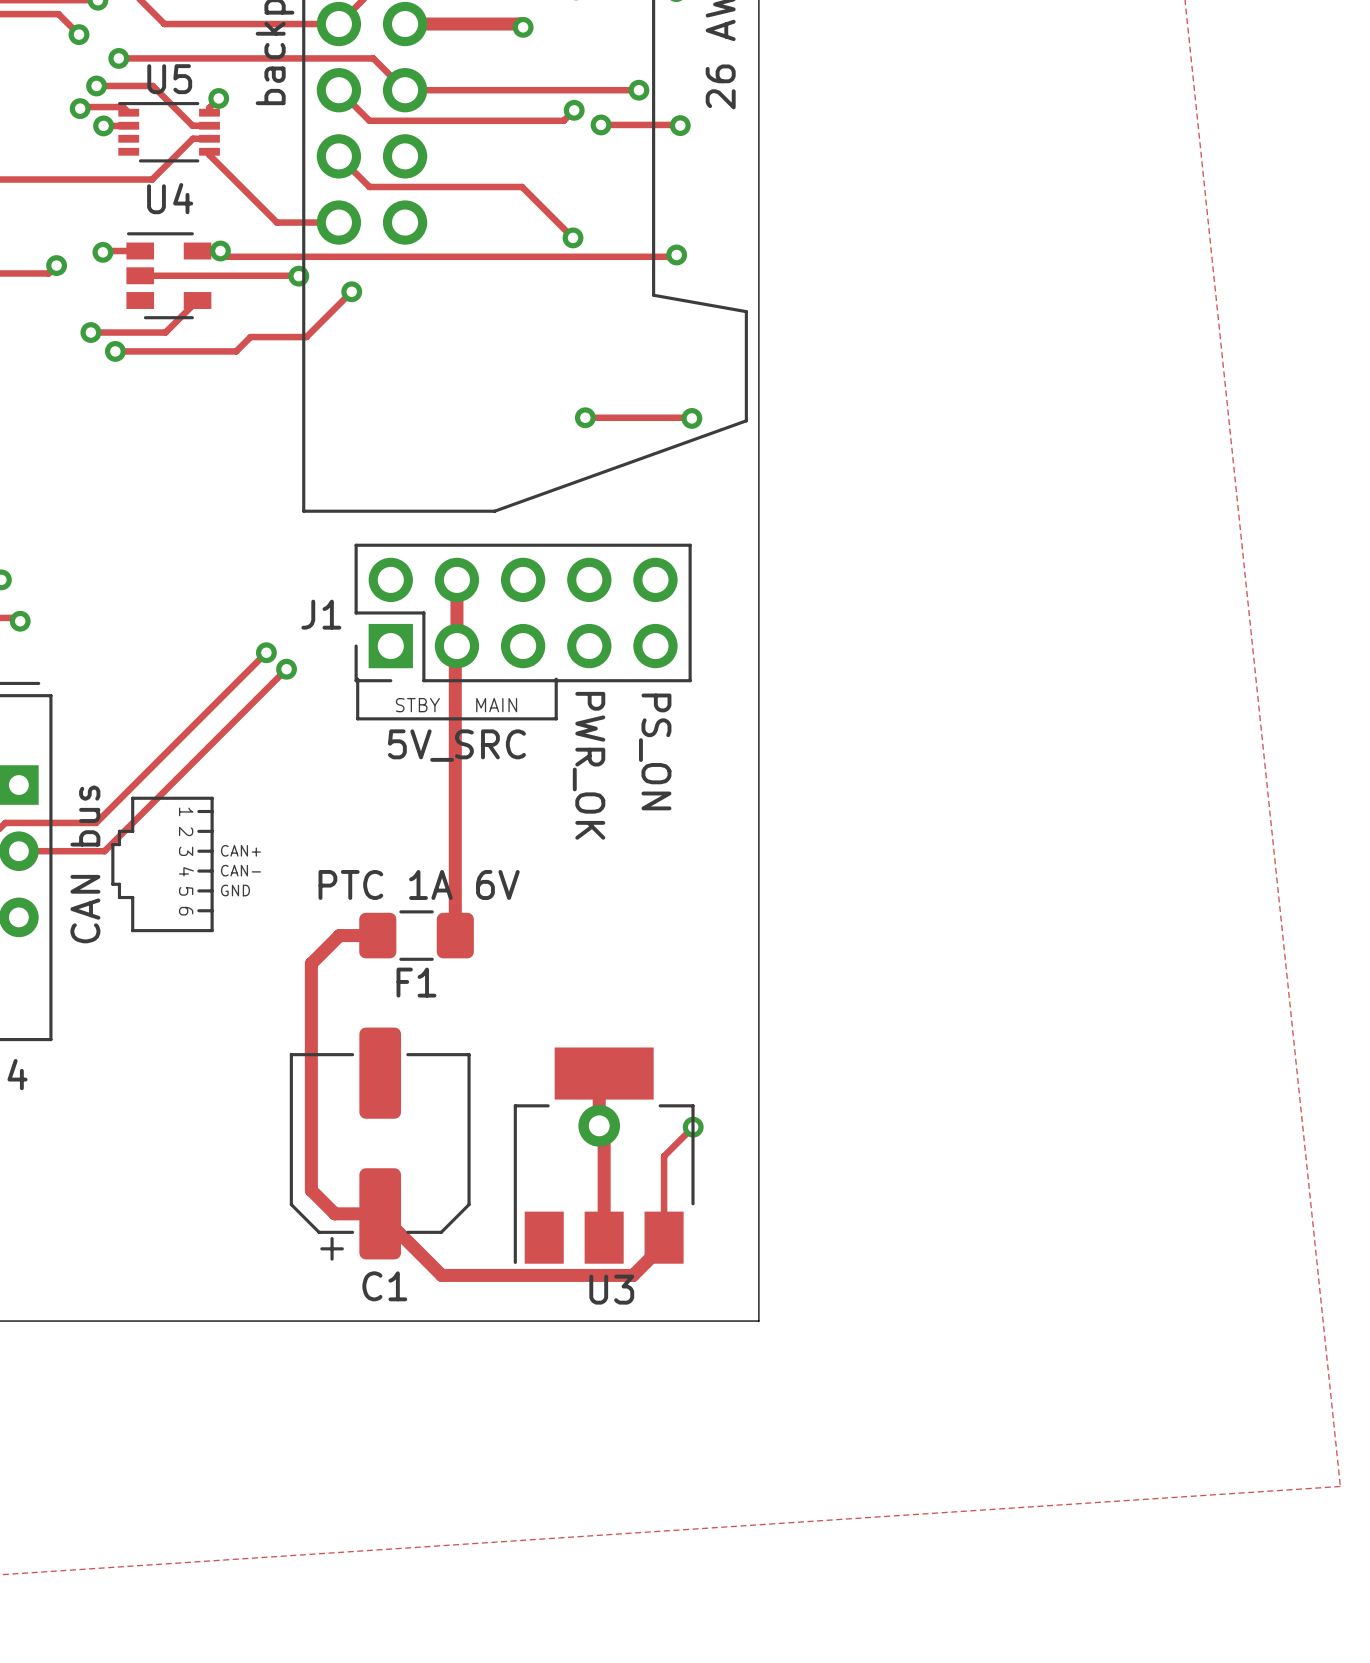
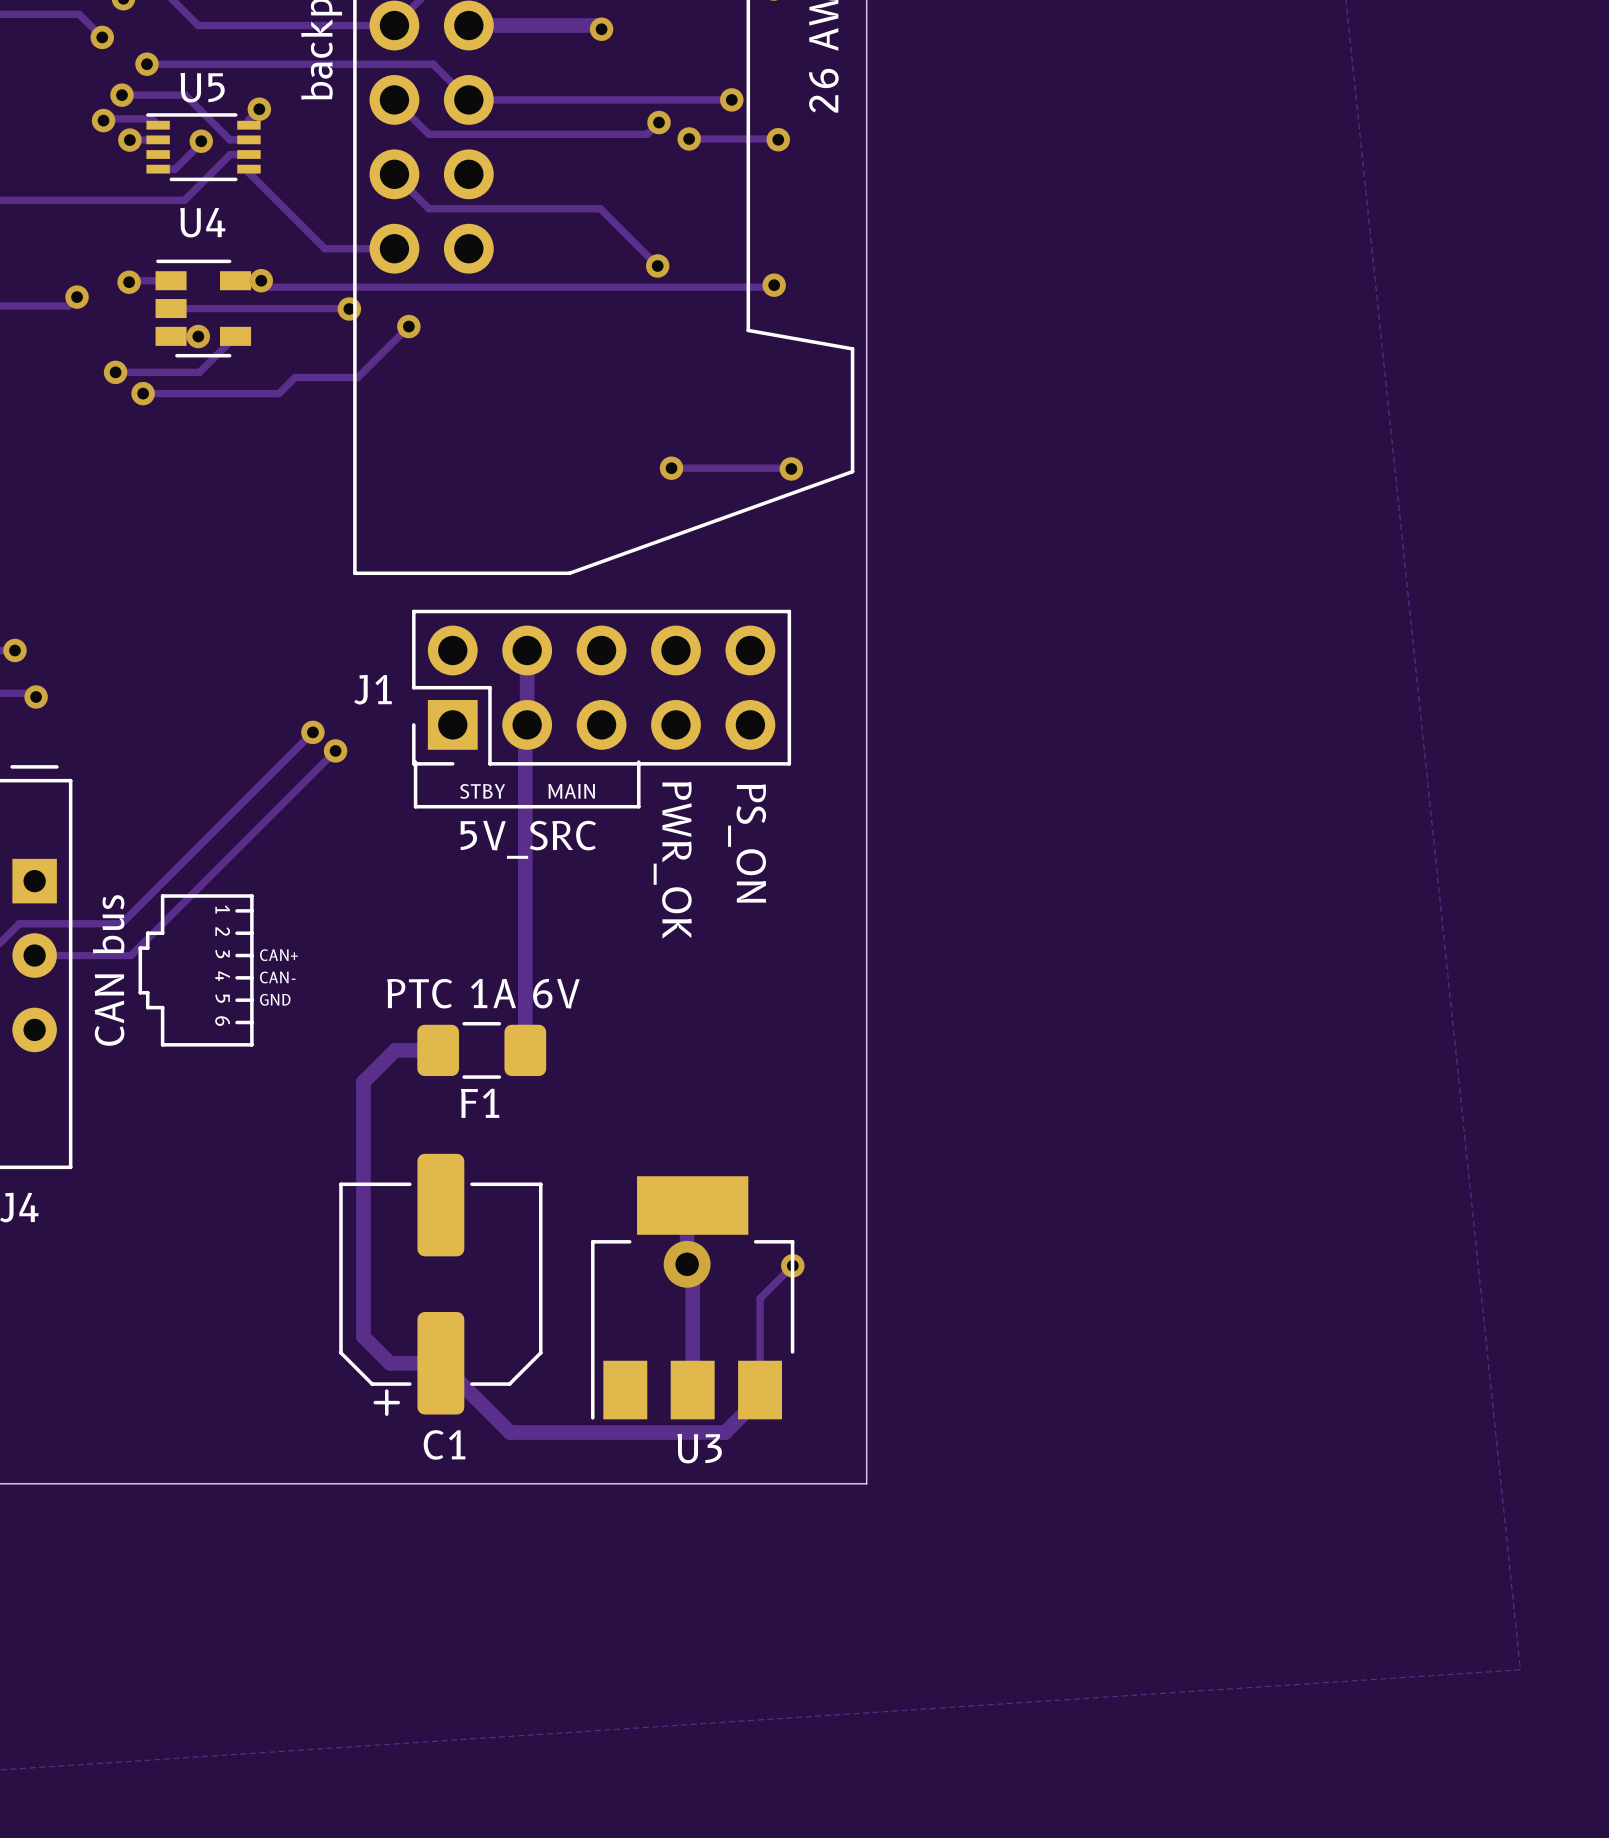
via: none -> (201, 141)
track: none -> (201, 142) (175, 169) (158, 169)
via: none -> (198, 336)

